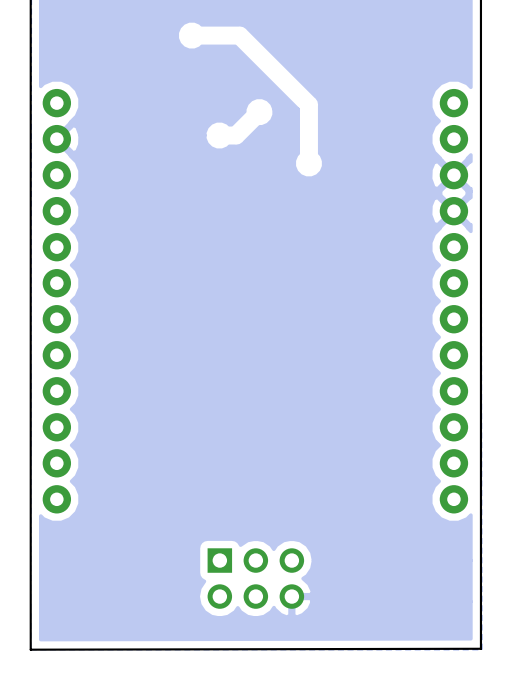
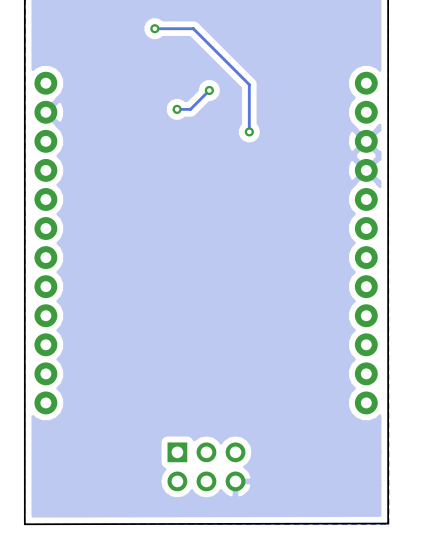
track: none -> (154, 28) (193, 28) (249, 84) (249, 131)
via: none -> (154, 28)
track: none -> (209, 90) (190, 109) (177, 109)
via: none -> (209, 90)
via: none -> (177, 109)
via: none -> (249, 131)

